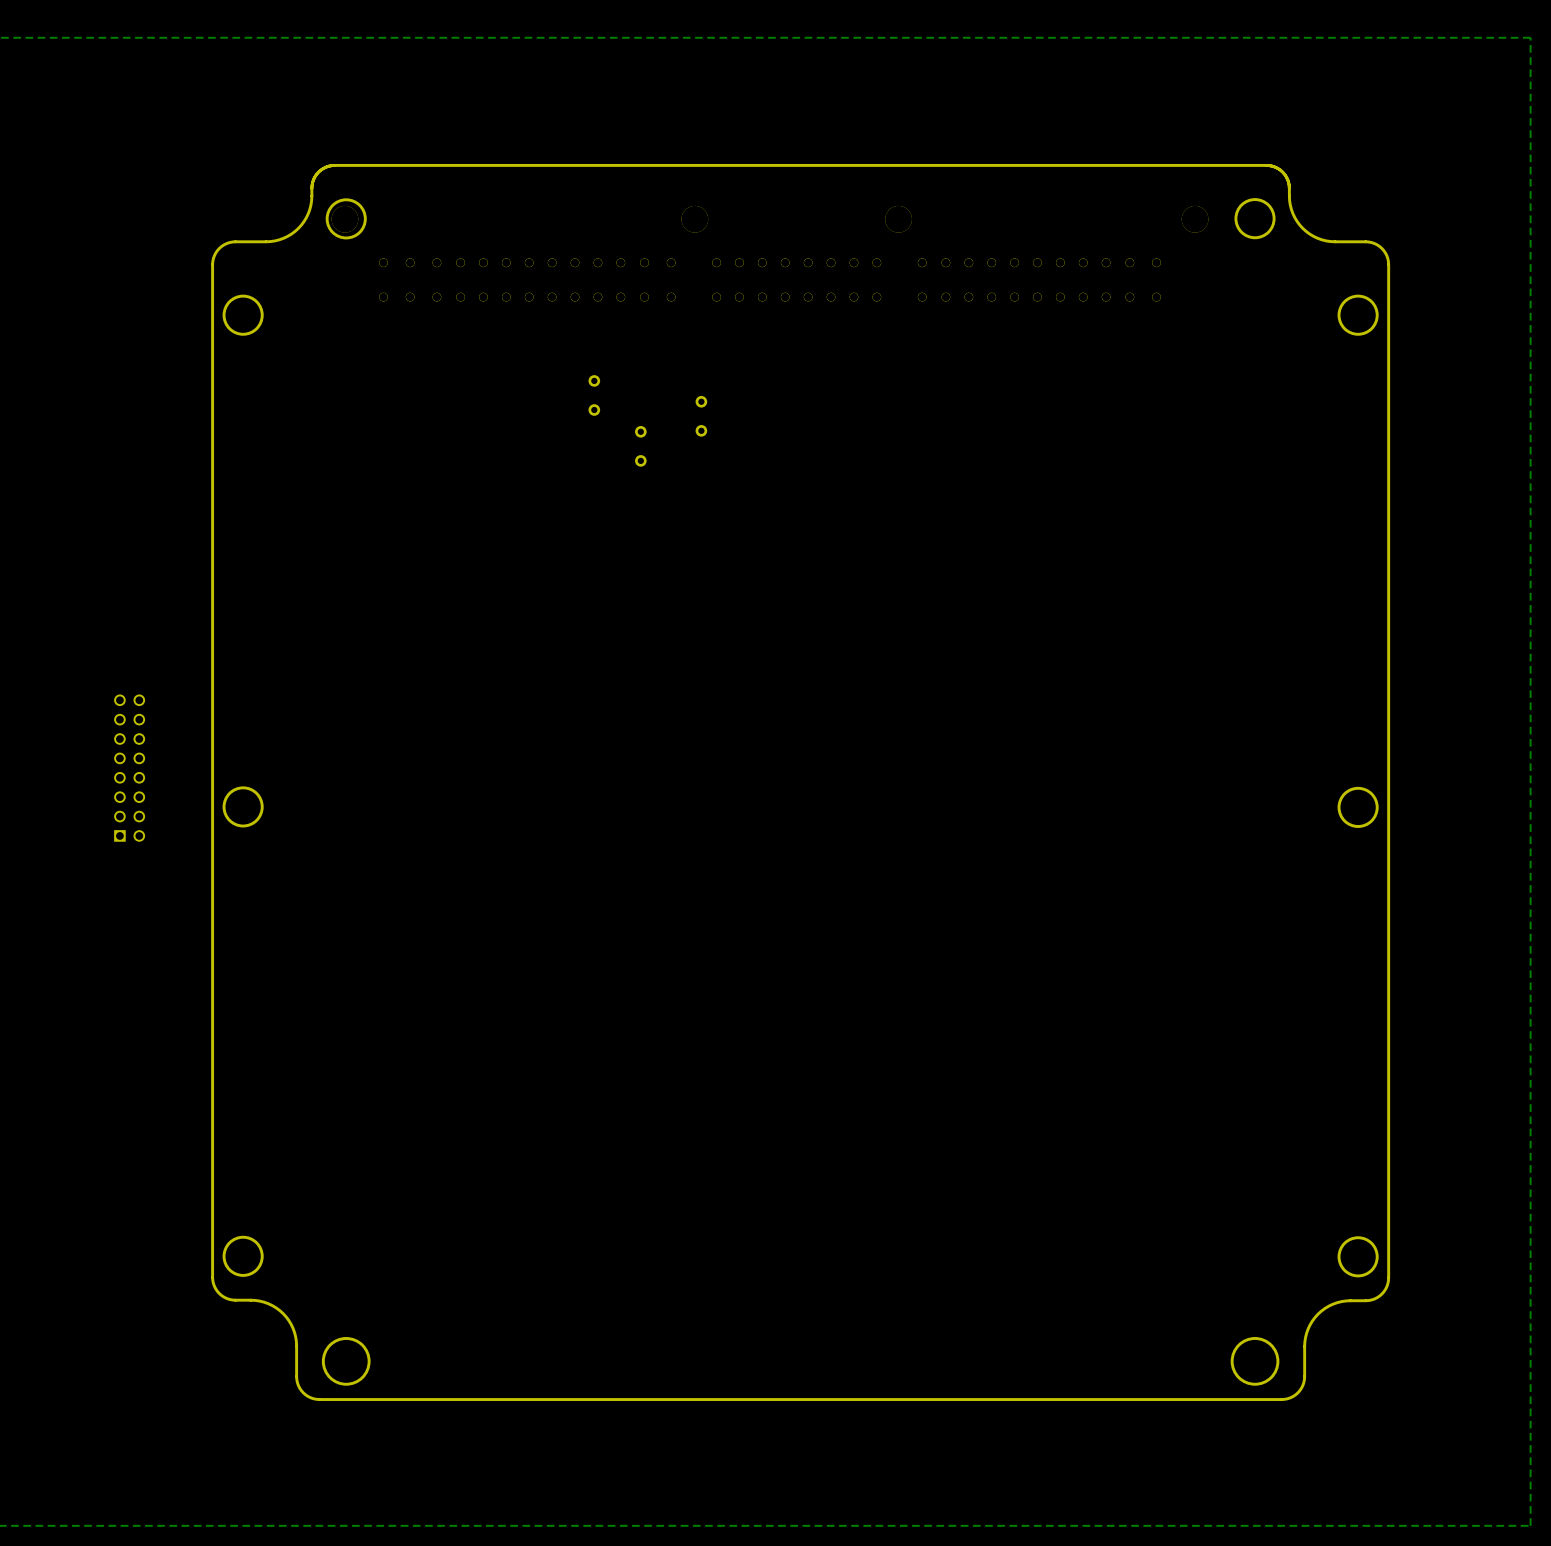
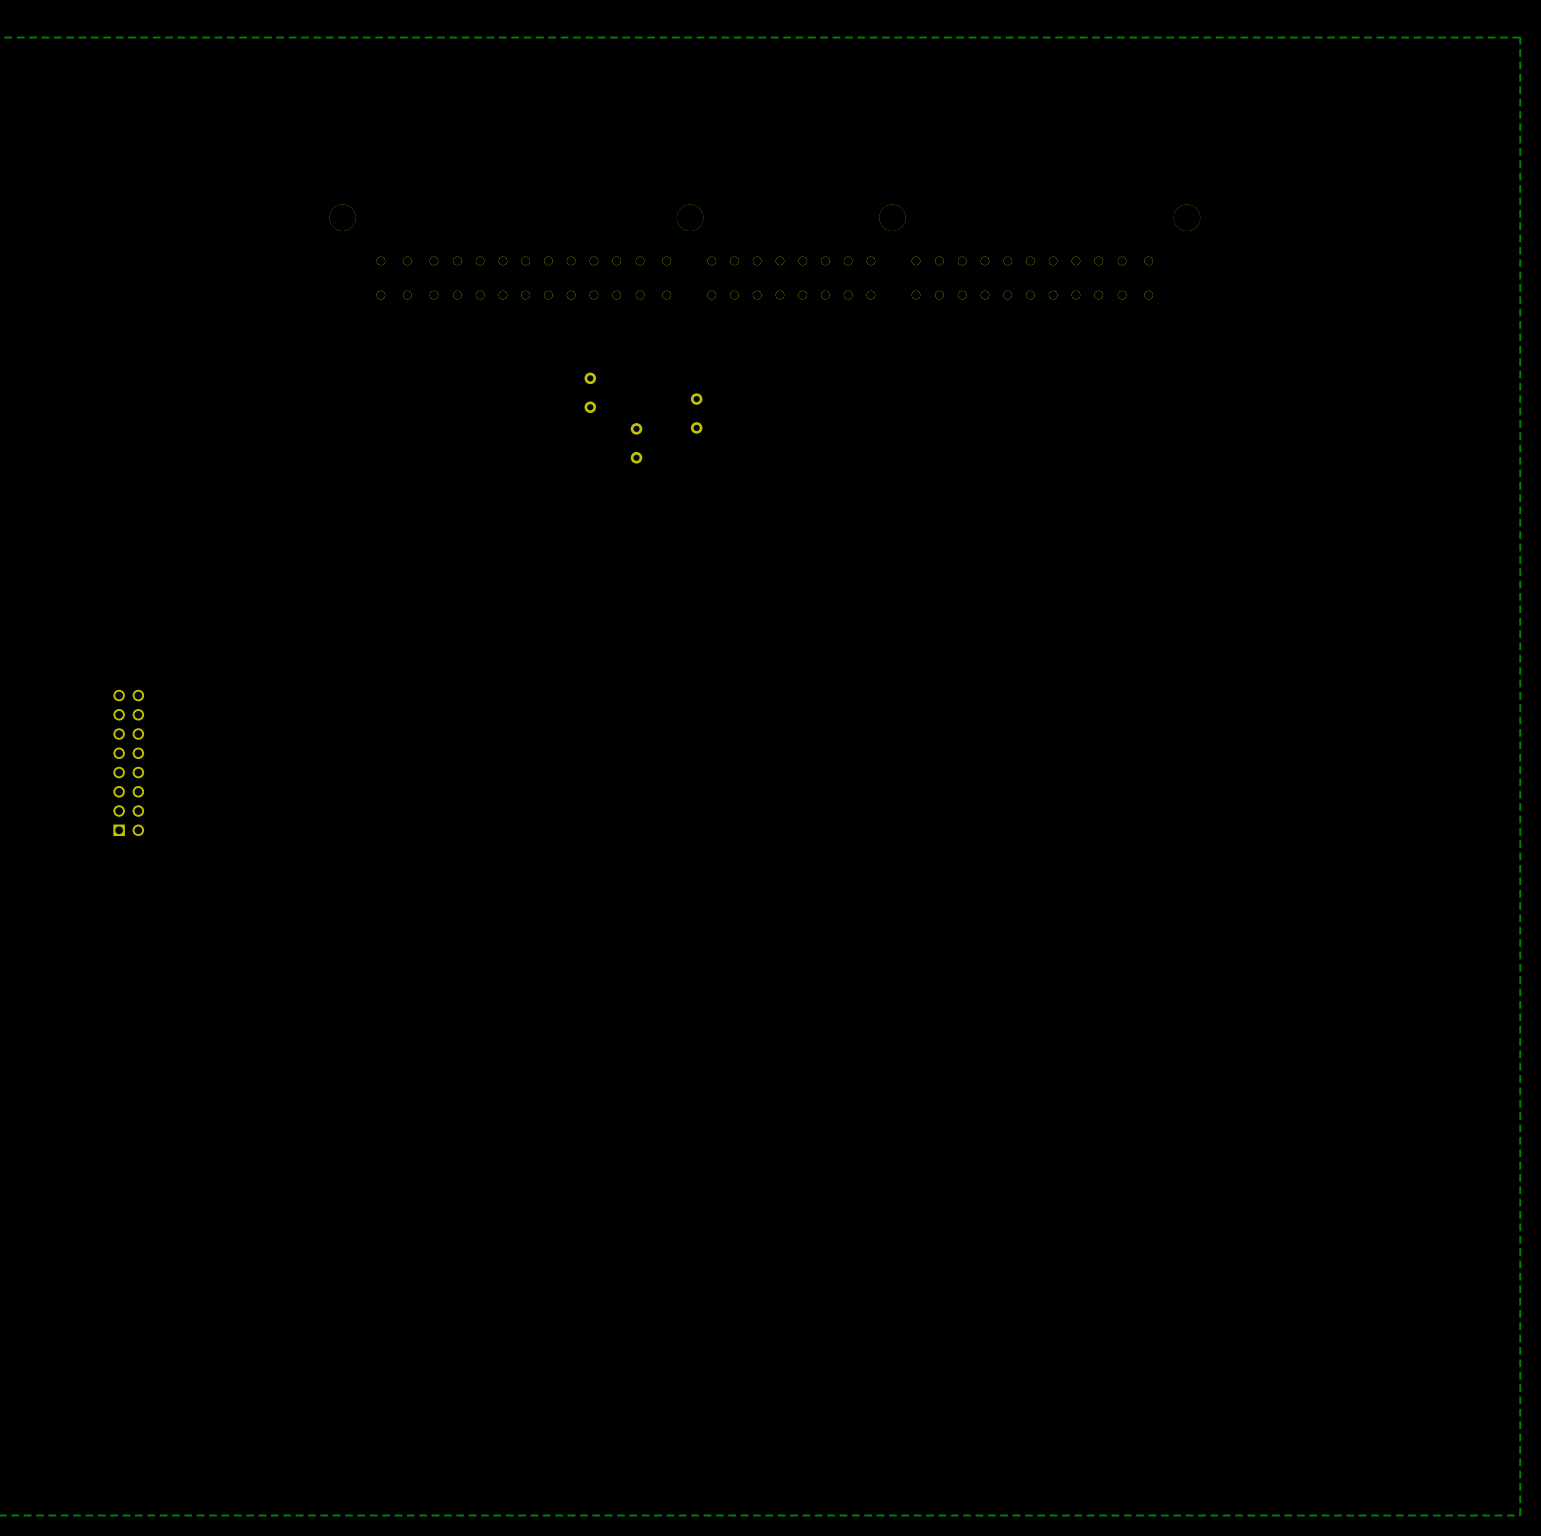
board edge: (334, 165) (326, 167) (318, 172) (313, 179) (311, 188) -> none
board edge: (334, 165) (326, 167) (318, 172) (313, 179) (311, 188) -> none
board edge: (1266, 165) (334, 165) -> none
board edge: (1266, 165) (1275, 167) (1282, 172) (1287, 179) (1289, 188) -> none
board edge: (1266, 165) (1275, 167) (1282, 172) (1287, 179) (1289, 188) -> none
board edge: (311, 188) (308, 213) (301, 225) (291, 234) (270, 241) (235, 241) -> none
board edge: (1289, 188) (1292, 213) (1299, 225) (1309, 234) (1330, 241) (1374, 243) (1383, 250) (1388, 261) (1388, 1277) (1385, 1289) (1377, 1297) (1368, 1300) (1337, 1302) (1325, 1308) (1315, 1317) (1305, 1337) (1302, 1385) (1293, 1396) (1281, 1399) (319, 1399) (310, 1397) (303, 1392) (296, 1379) (295, 1337) (286, 1316) (276, 1307) (264, 1302) (232, 1300) (224, 1297) (215, 1288) (212, 1277) (212, 264) (214, 255) (219, 248) (226, 243) (235, 241) -> none
round board edge: [325, 198, 367, 240] -> none
round board edge: [1234, 198, 1276, 240] -> none
round board edge: [222, 294, 264, 336] -> none
round board edge: [1337, 294, 1379, 336] -> none
round board edge: [222, 786, 264, 828] -> none
round board edge: [1337, 786, 1379, 828] -> none
round board edge: [222, 1235, 264, 1277] -> none
round board edge: [1337, 1236, 1379, 1278] -> none
round board edge: [321, 1337, 371, 1386] -> none
round board edge: [1230, 1337, 1280, 1386] -> none

